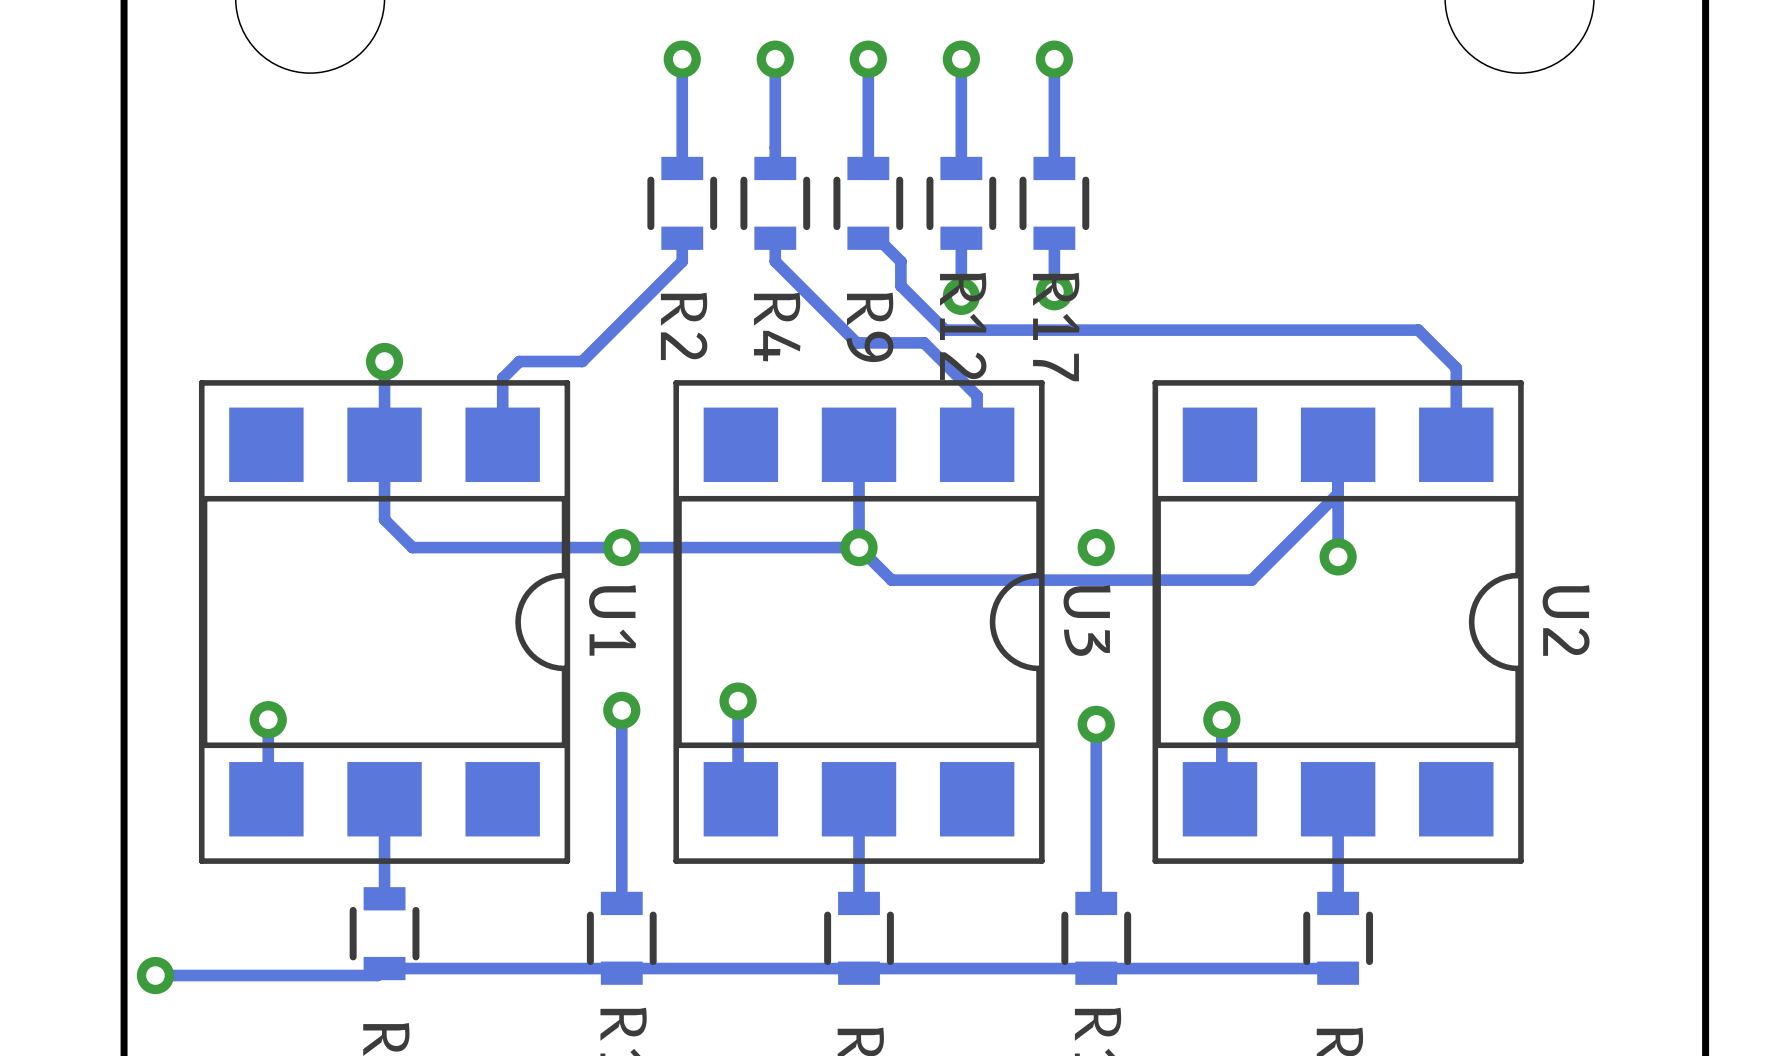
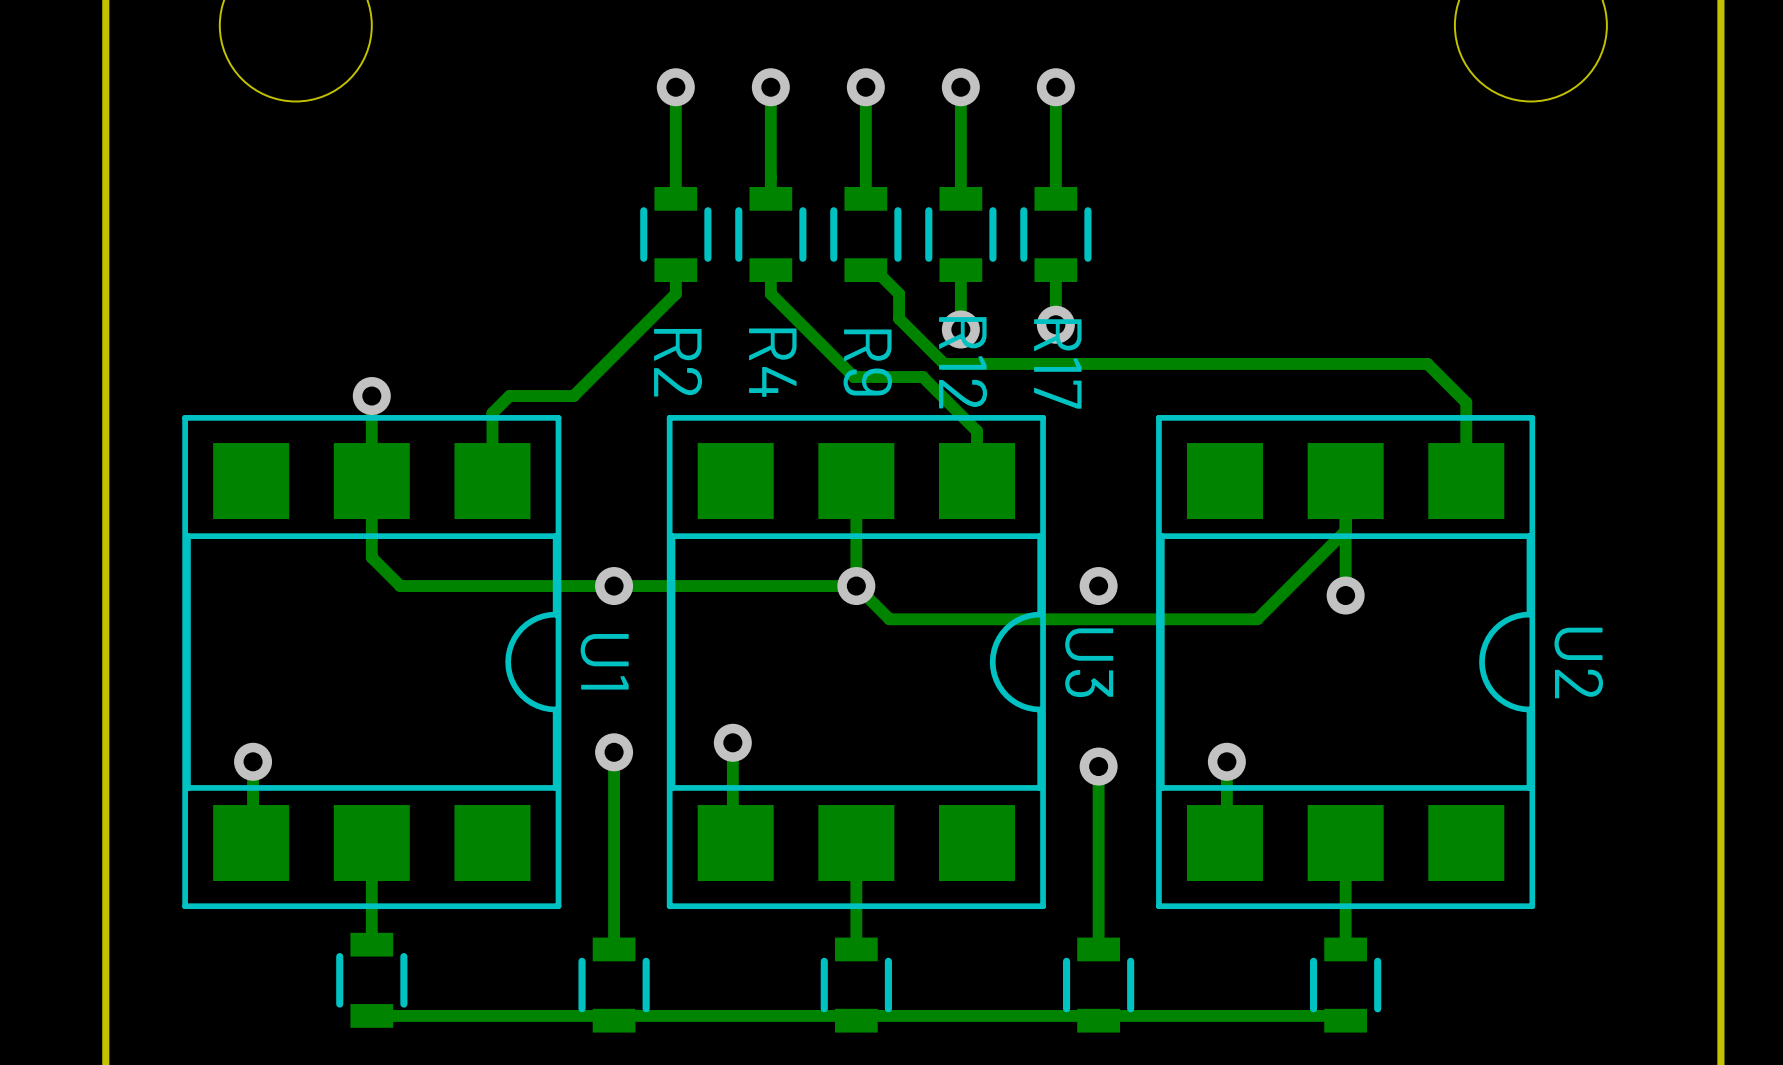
track: (384, 968) (377, 975) (155, 975) -> none
via: (155, 975) -> none

